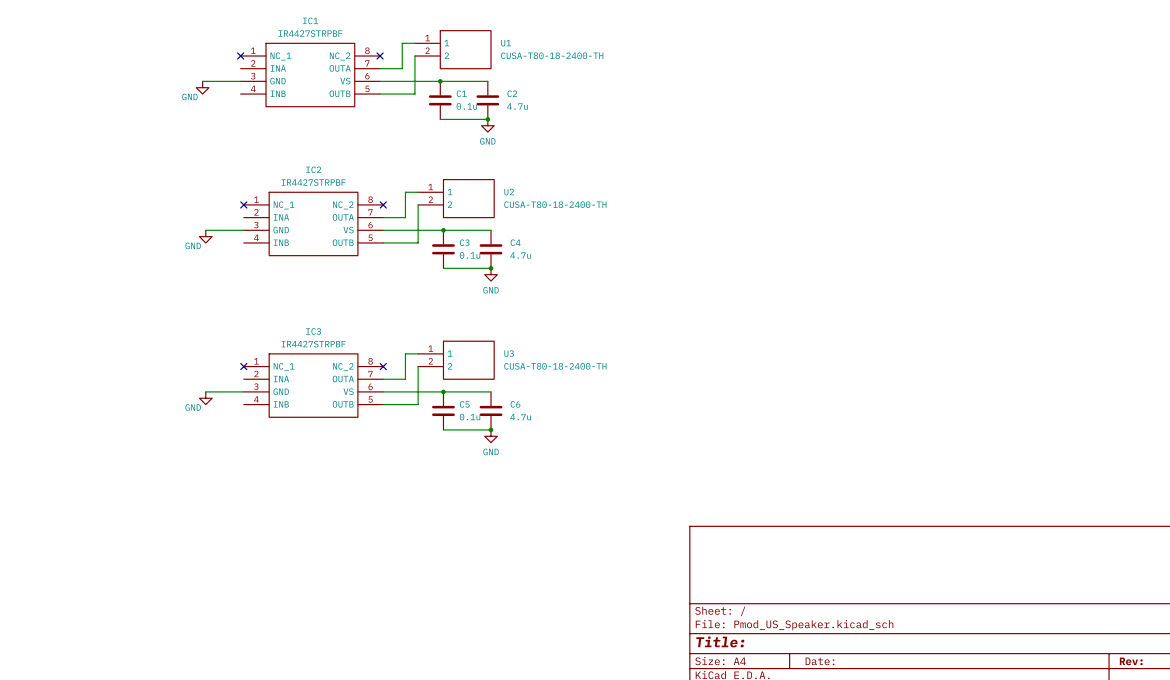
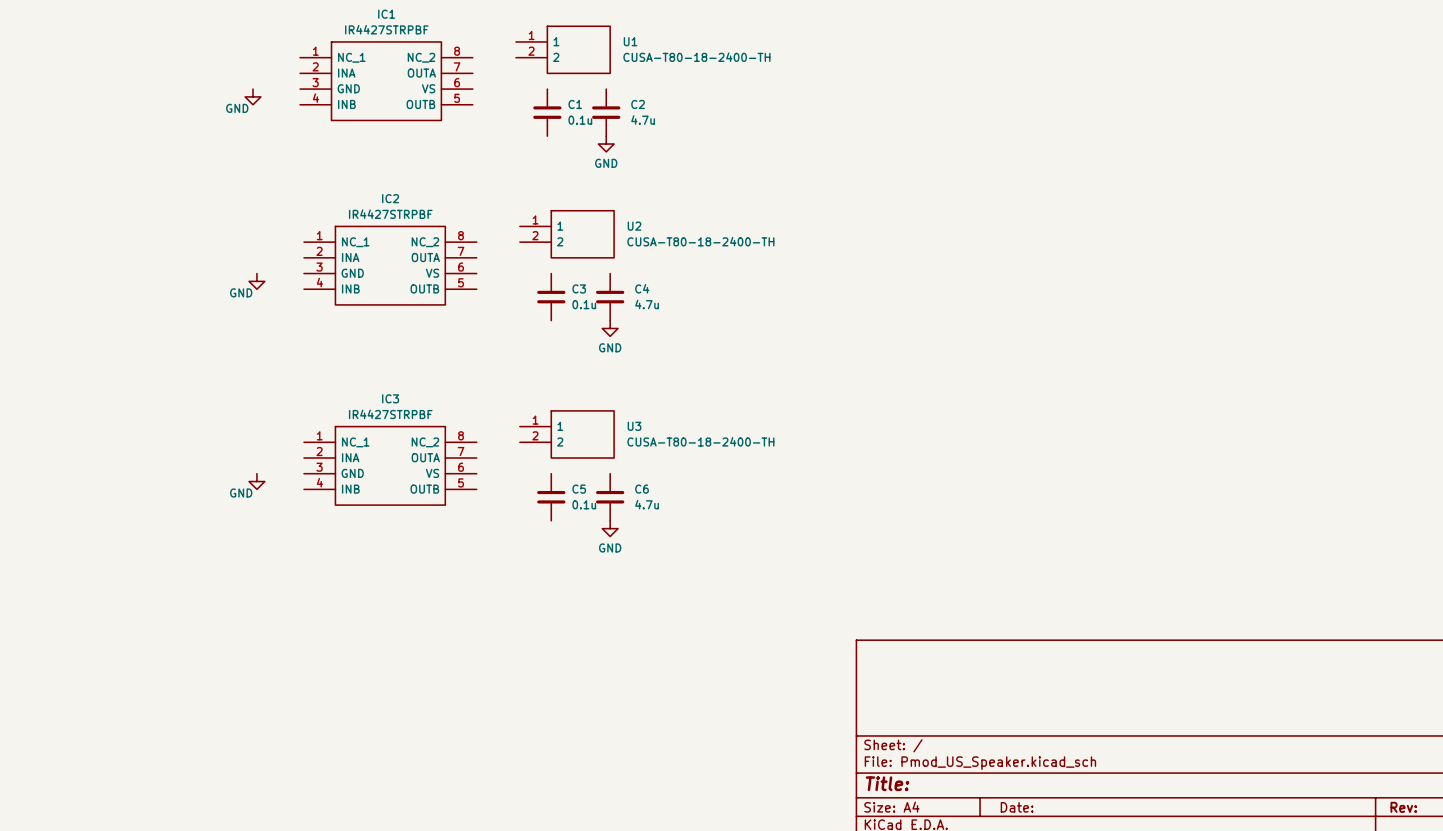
wire: (414, 43) (402, 43) (402, 68) (380, 68) -> none
no-connect mark: (240, 56) -> none
no-connect mark: (380, 56) -> none
wire: (414, 56) (414, 94) (380, 94) -> none
wire: (202, 81) (240, 81) -> none
wire: (380, 81) (487, 81) -> none
junction: (440, 81) -> none
wire: (440, 119) (487, 119) -> none
junction: (487, 119) -> none
wire: (418, 192) (405, 192) (405, 217) (383, 217) -> none
no-connect mark: (243, 204) -> none
no-connect mark: (383, 204) -> none
wire: (418, 204) (418, 242) (383, 242) -> none
wire: (205, 230) (243, 230) -> none
wire: (383, 230) (491, 230) -> none
junction: (443, 230) -> none
wire: (443, 268) (491, 268) -> none
junction: (491, 268) -> none
wire: (418, 353) (405, 353) (405, 379) (383, 379) -> none
no-connect mark: (243, 366) -> none
no-connect mark: (383, 366) -> none
wire: (418, 366) (418, 404) (383, 404) -> none
wire: (205, 391) (243, 391) -> none
wire: (383, 391) (491, 391) -> none
junction: (443, 391) -> none
wire: (443, 429) (491, 429) -> none
junction: (491, 429) -> none

